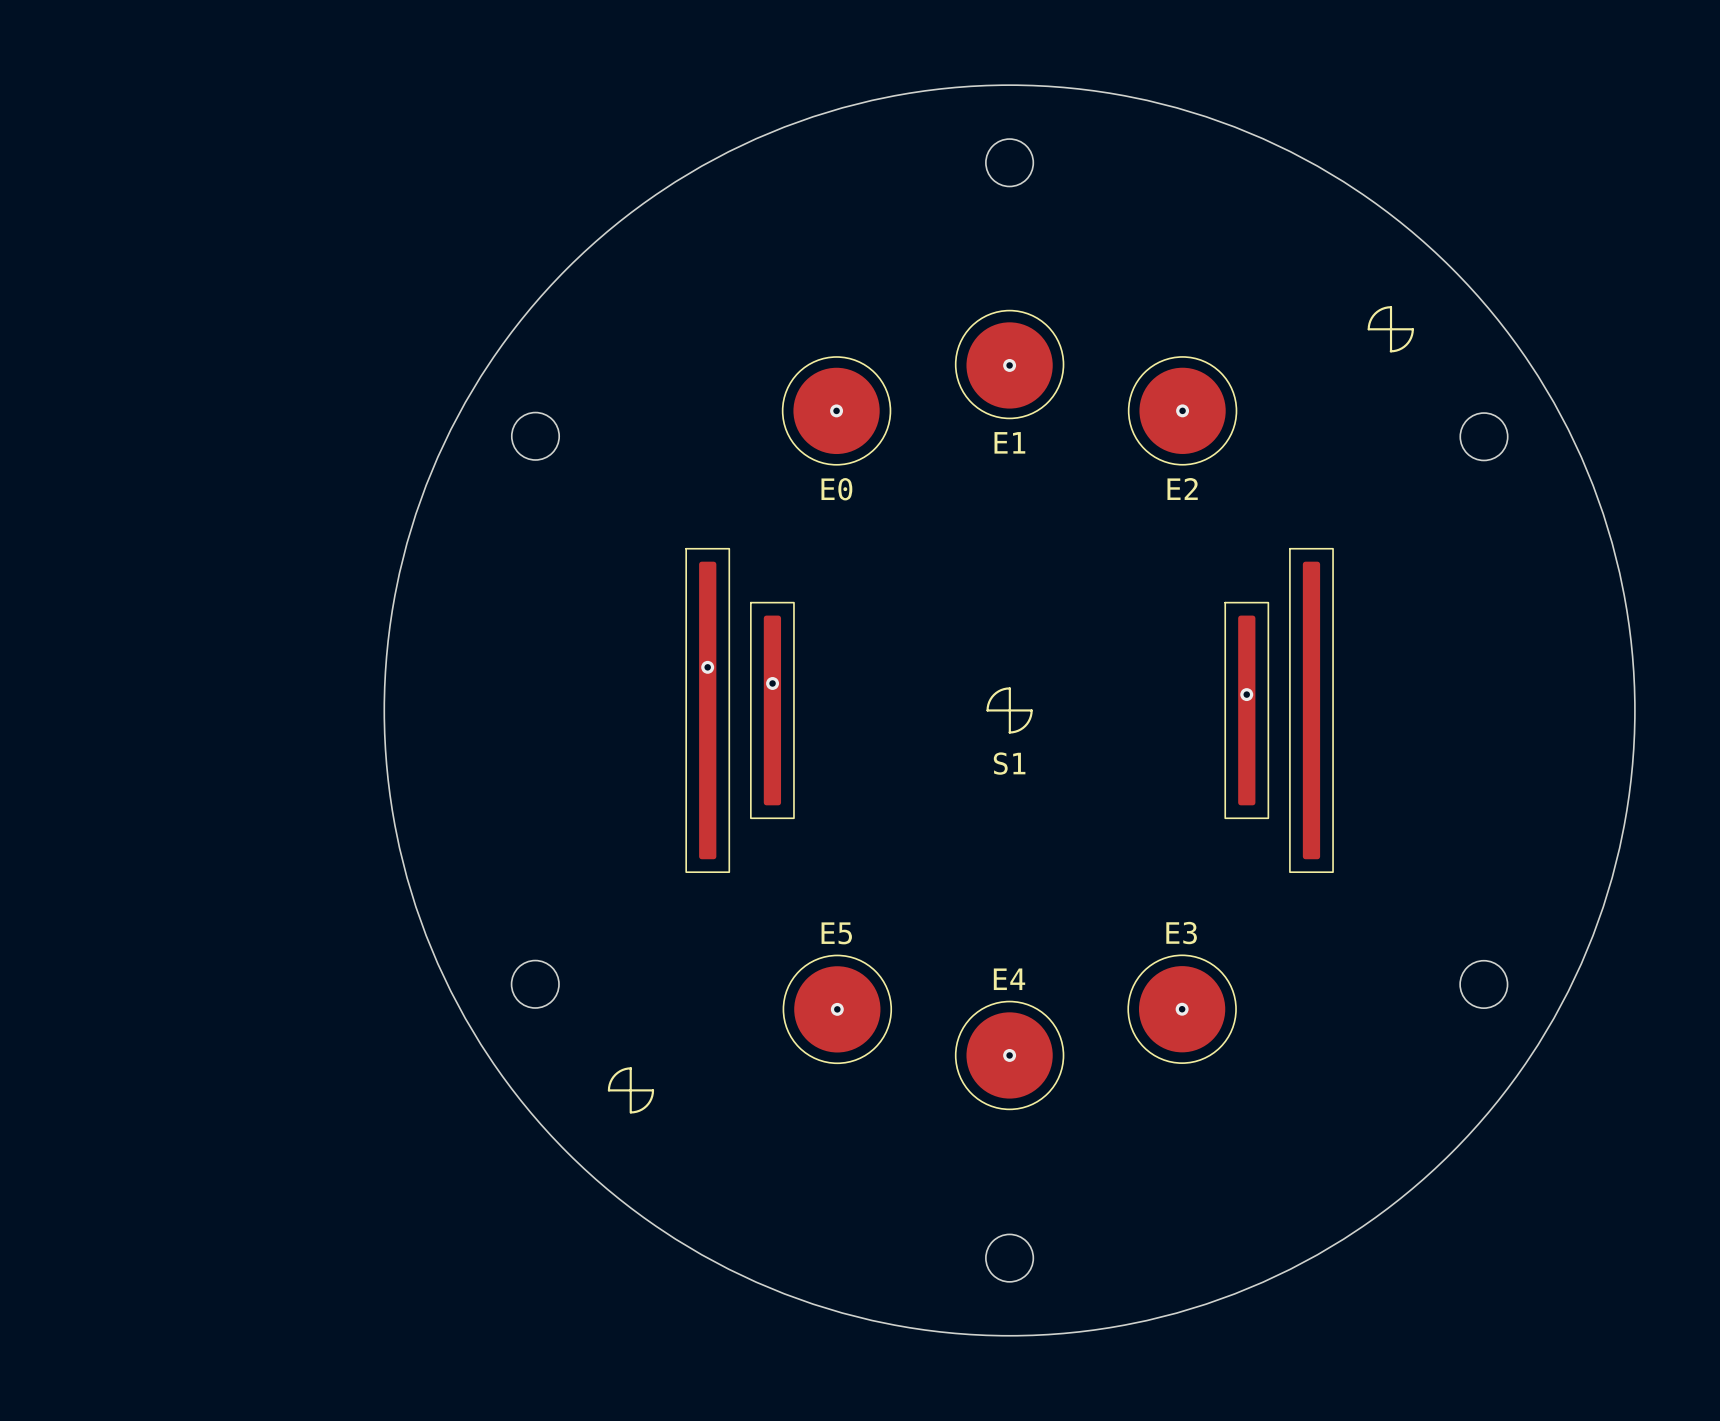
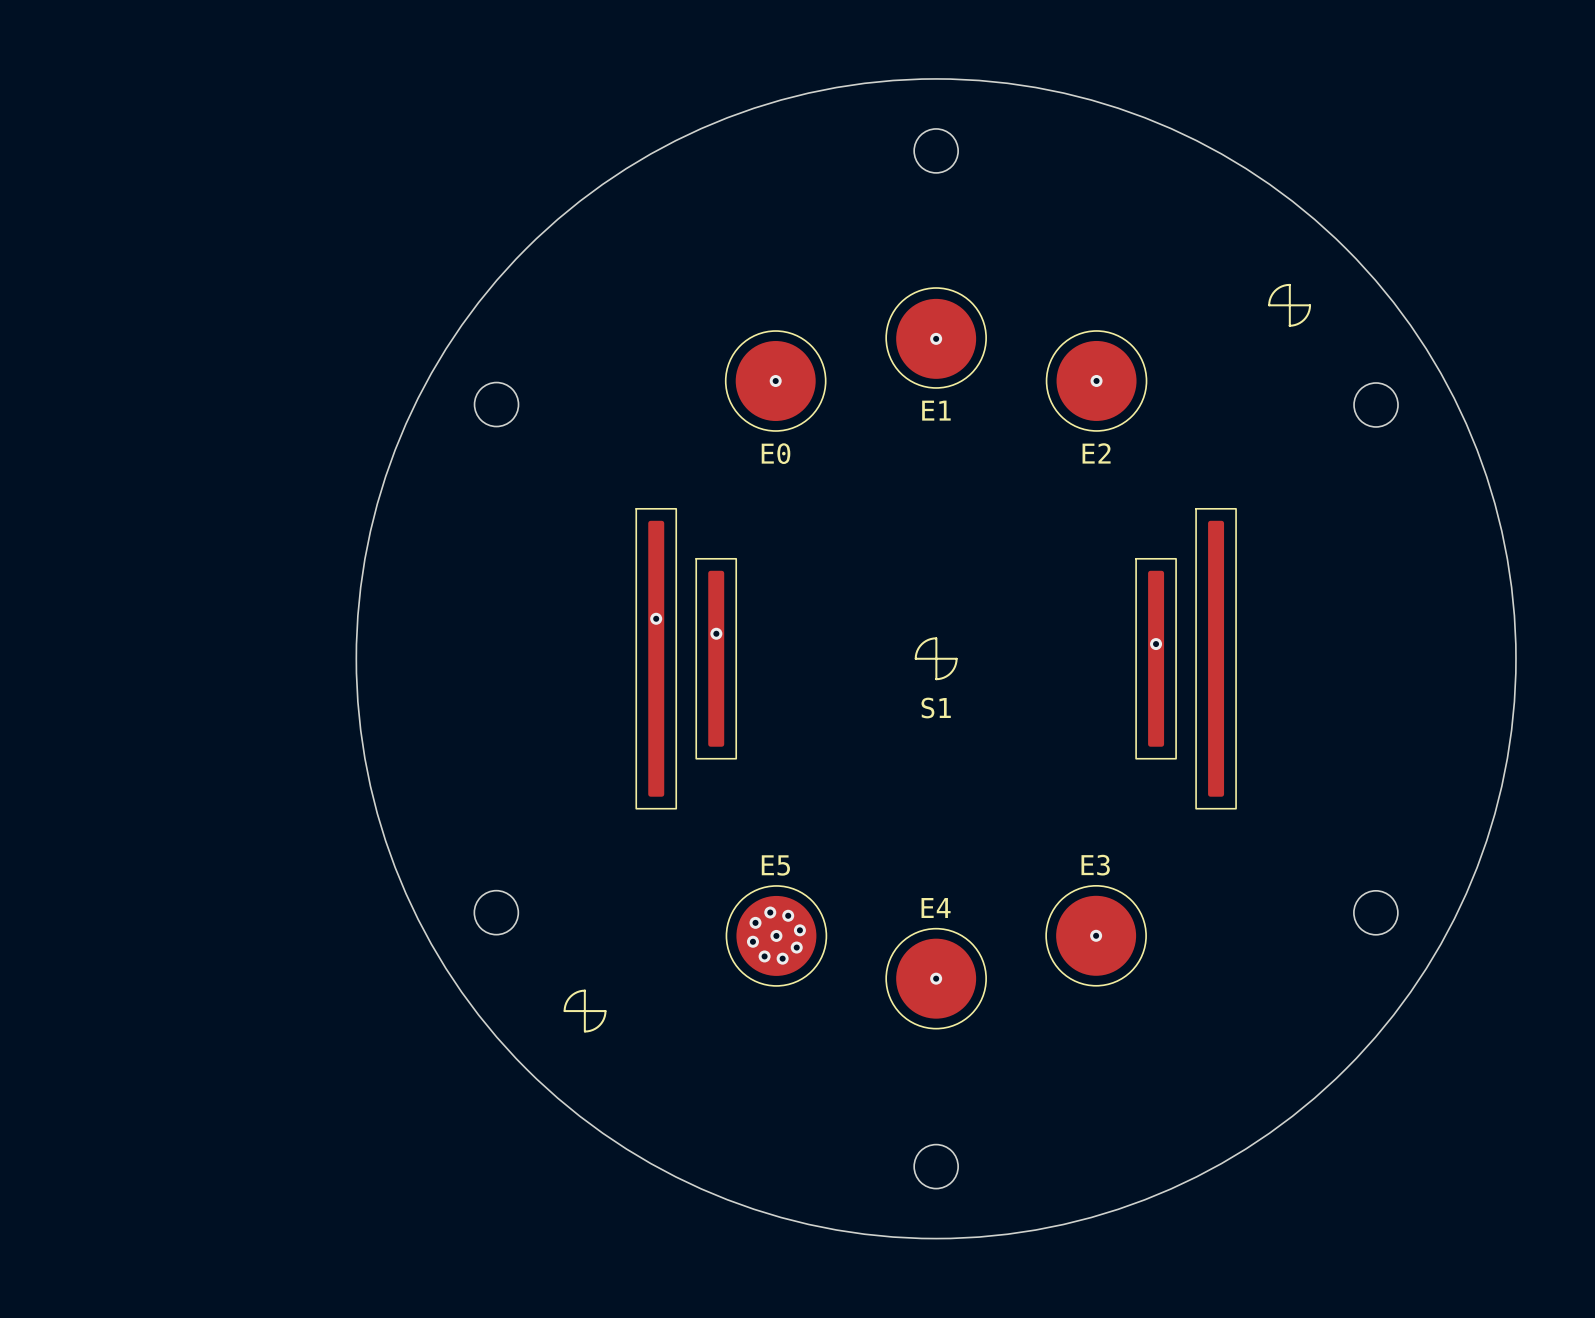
via: none -> (770, 912)
via: none -> (788, 915)
via: none -> (755, 922)
via: none -> (799, 930)
via: none -> (752, 941)
via: none -> (796, 947)
via: none -> (764, 956)
via: none -> (782, 958)

